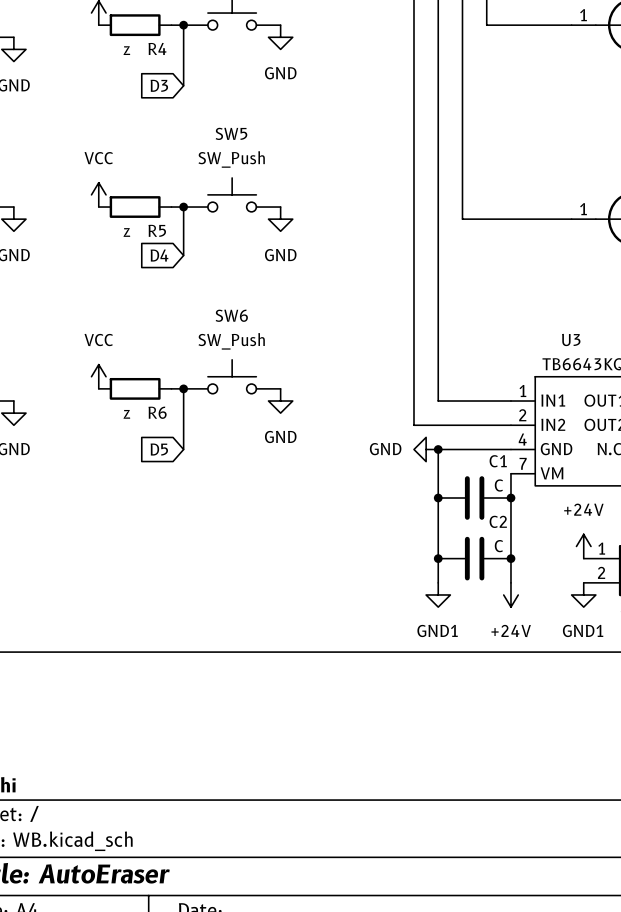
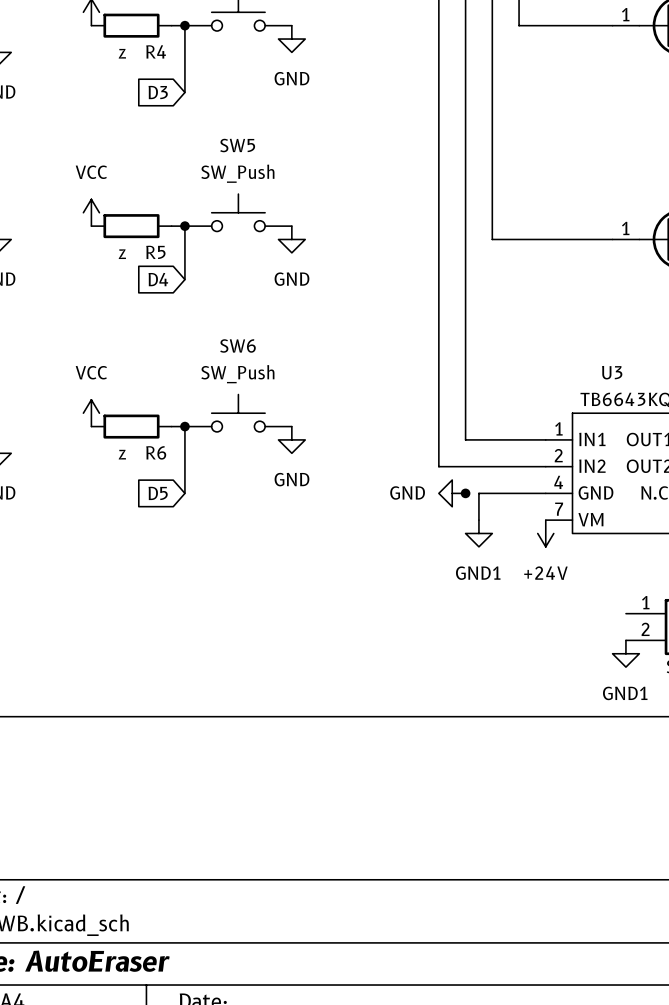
wire: (450, 449) (438, 449) (438, 582) -> (478, 493) (478, 520)
wire: (510, 473) (510, 582) -> none
power symbol: none -> +24V (545, 533)
junction: (438, 498) -> none
C1: C (474, 498) -> none
junction: (510, 498) -> none
power symbol: +24V (583, 546) -> none
junction: (438, 558) -> none
C2: C (474, 558) -> none
junction: (510, 558) -> none
power symbol position: GND1 (438, 594) -> GND1 (478, 533)
power symbol: +24V (510, 594) -> none

